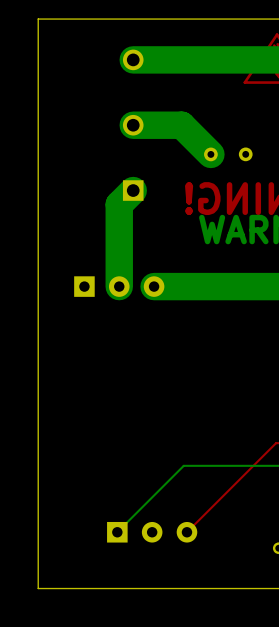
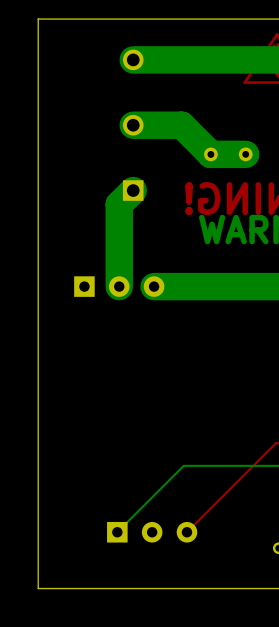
bottom track: none -> (245, 154) (210, 154)

